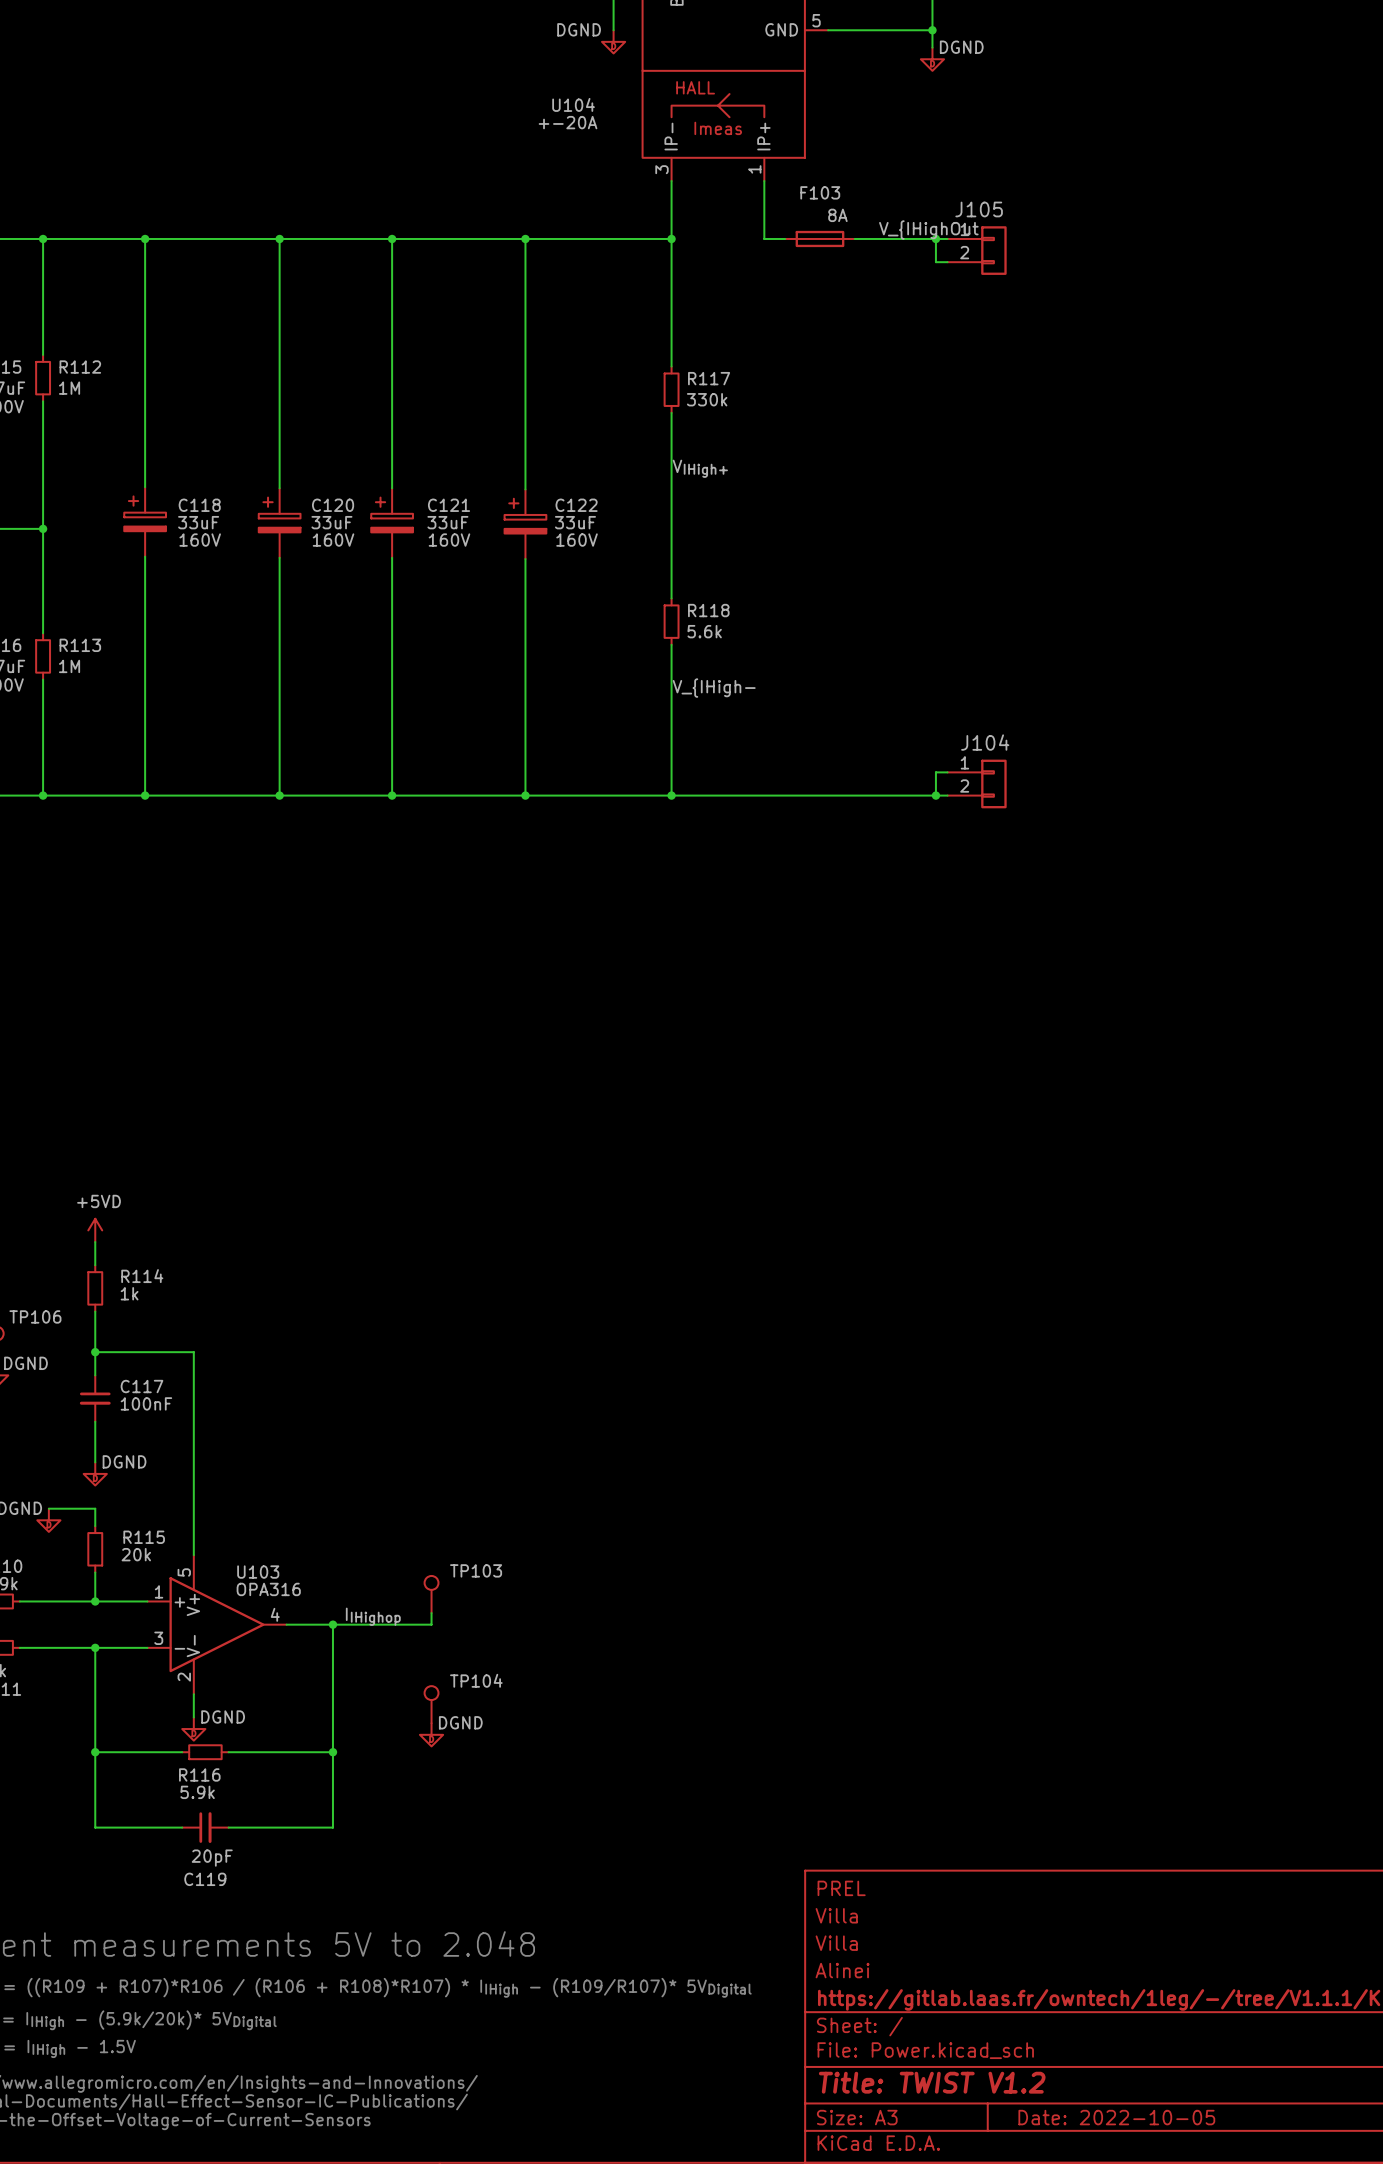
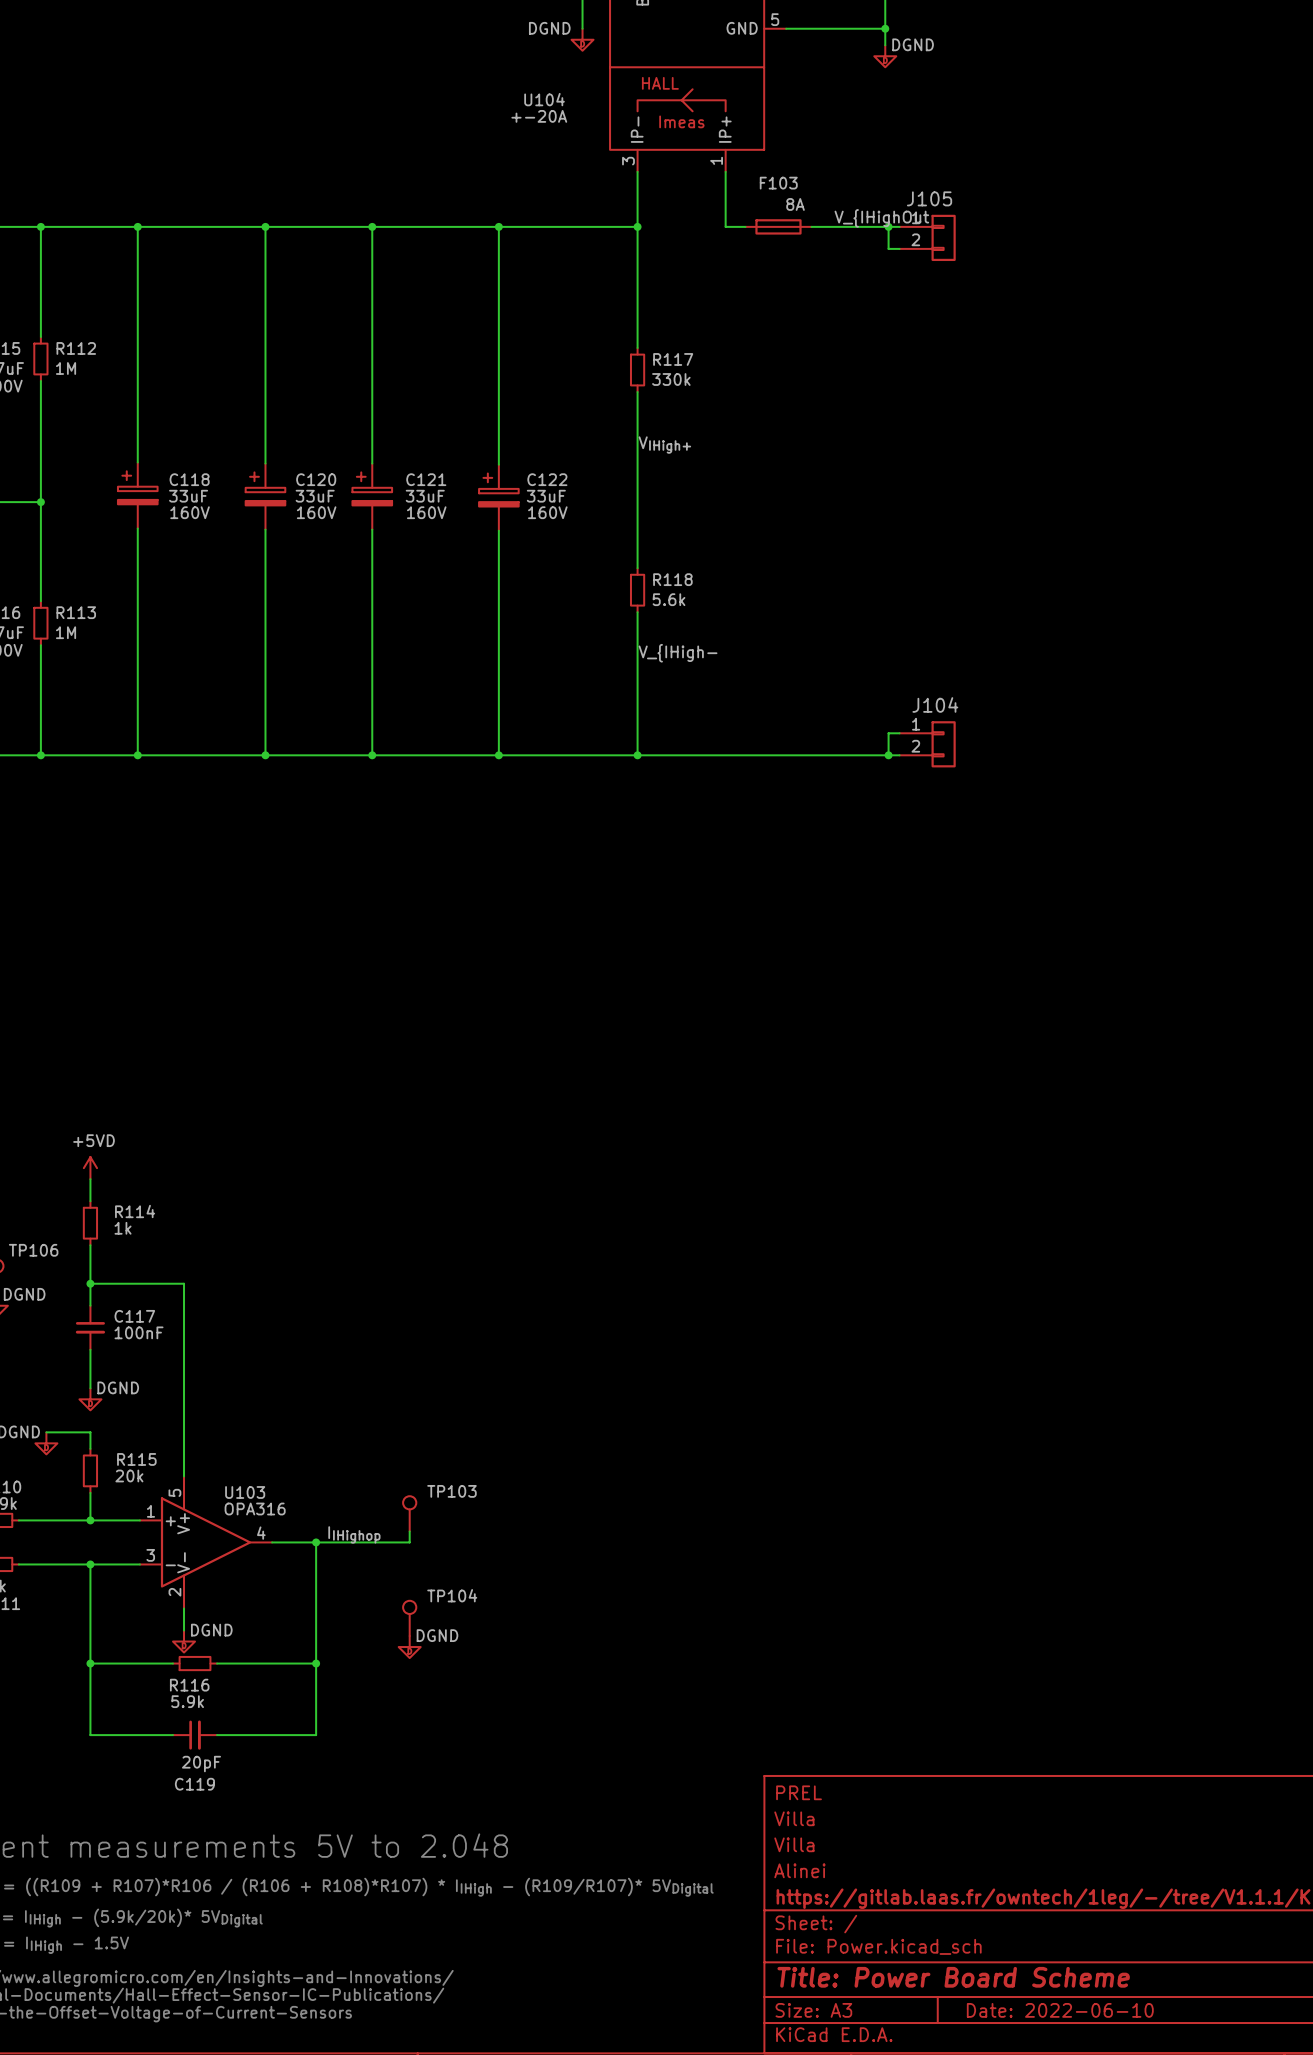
title block: Title: TWIST V1.2 (932, 2082) -> Title: Power Board Scheme (953, 1977)
title block: Date: 2022-10-05 (1116, 2117) -> Date: 2022-06-10 (1060, 2010)

